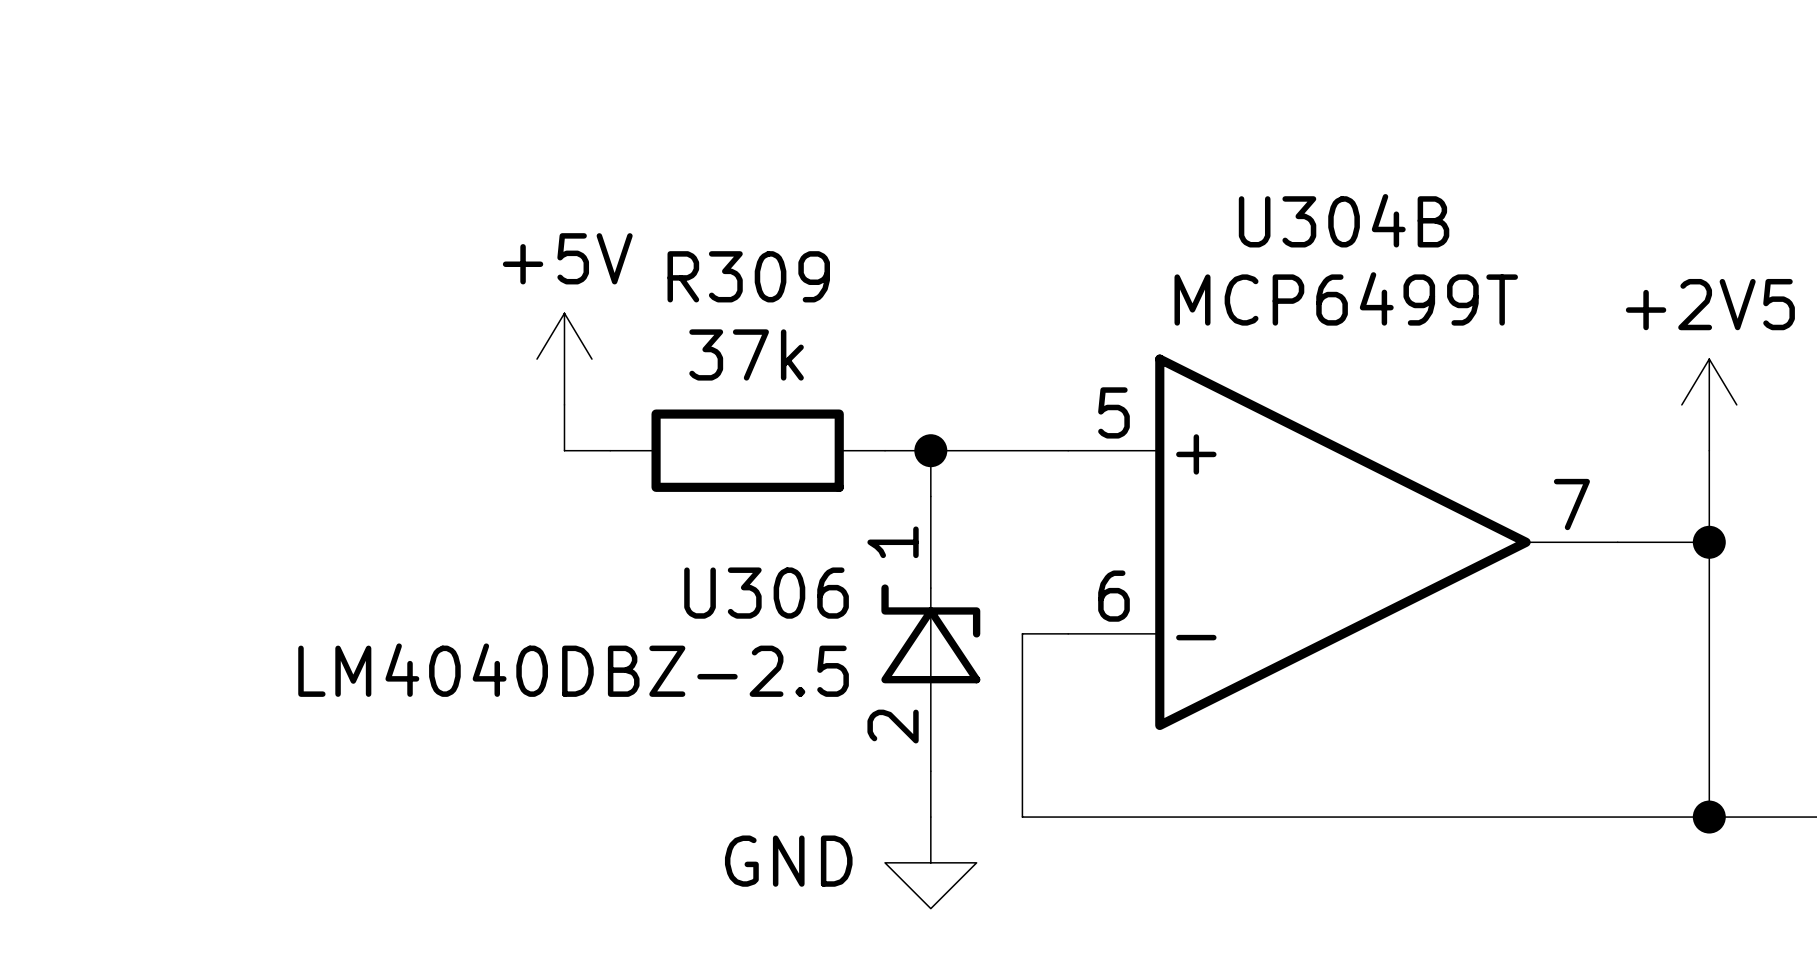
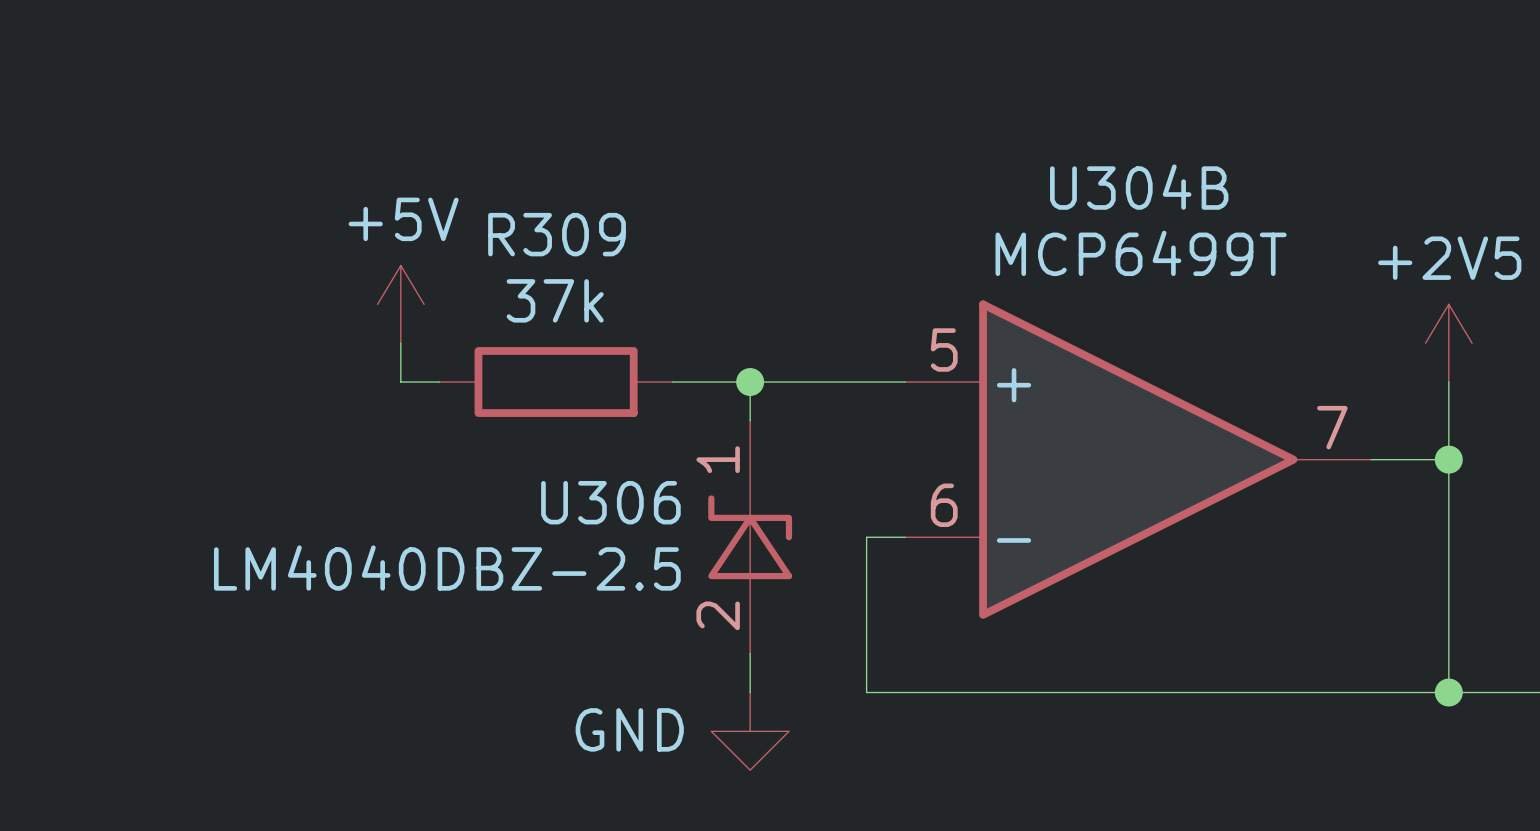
power symbol position: +5V (564, 359) -> +5V (400, 304)
wire: (564, 404) (564, 450) (610, 450) -> (400, 343) (400, 382) (439, 382)
R309 position: (747, 450) -> (556, 382)
wire: none -> (672, 382) (750, 382) (750, 420)
wire: (930, 450) (930, 496) -> none
junction position: (930, 450) -> (750, 382)
U306 position: (930, 633) -> (750, 537)
wire: (930, 771) (930, 817) -> (750, 653) (750, 692)
power symbol position: GND (930, 862) -> GND (750, 731)

